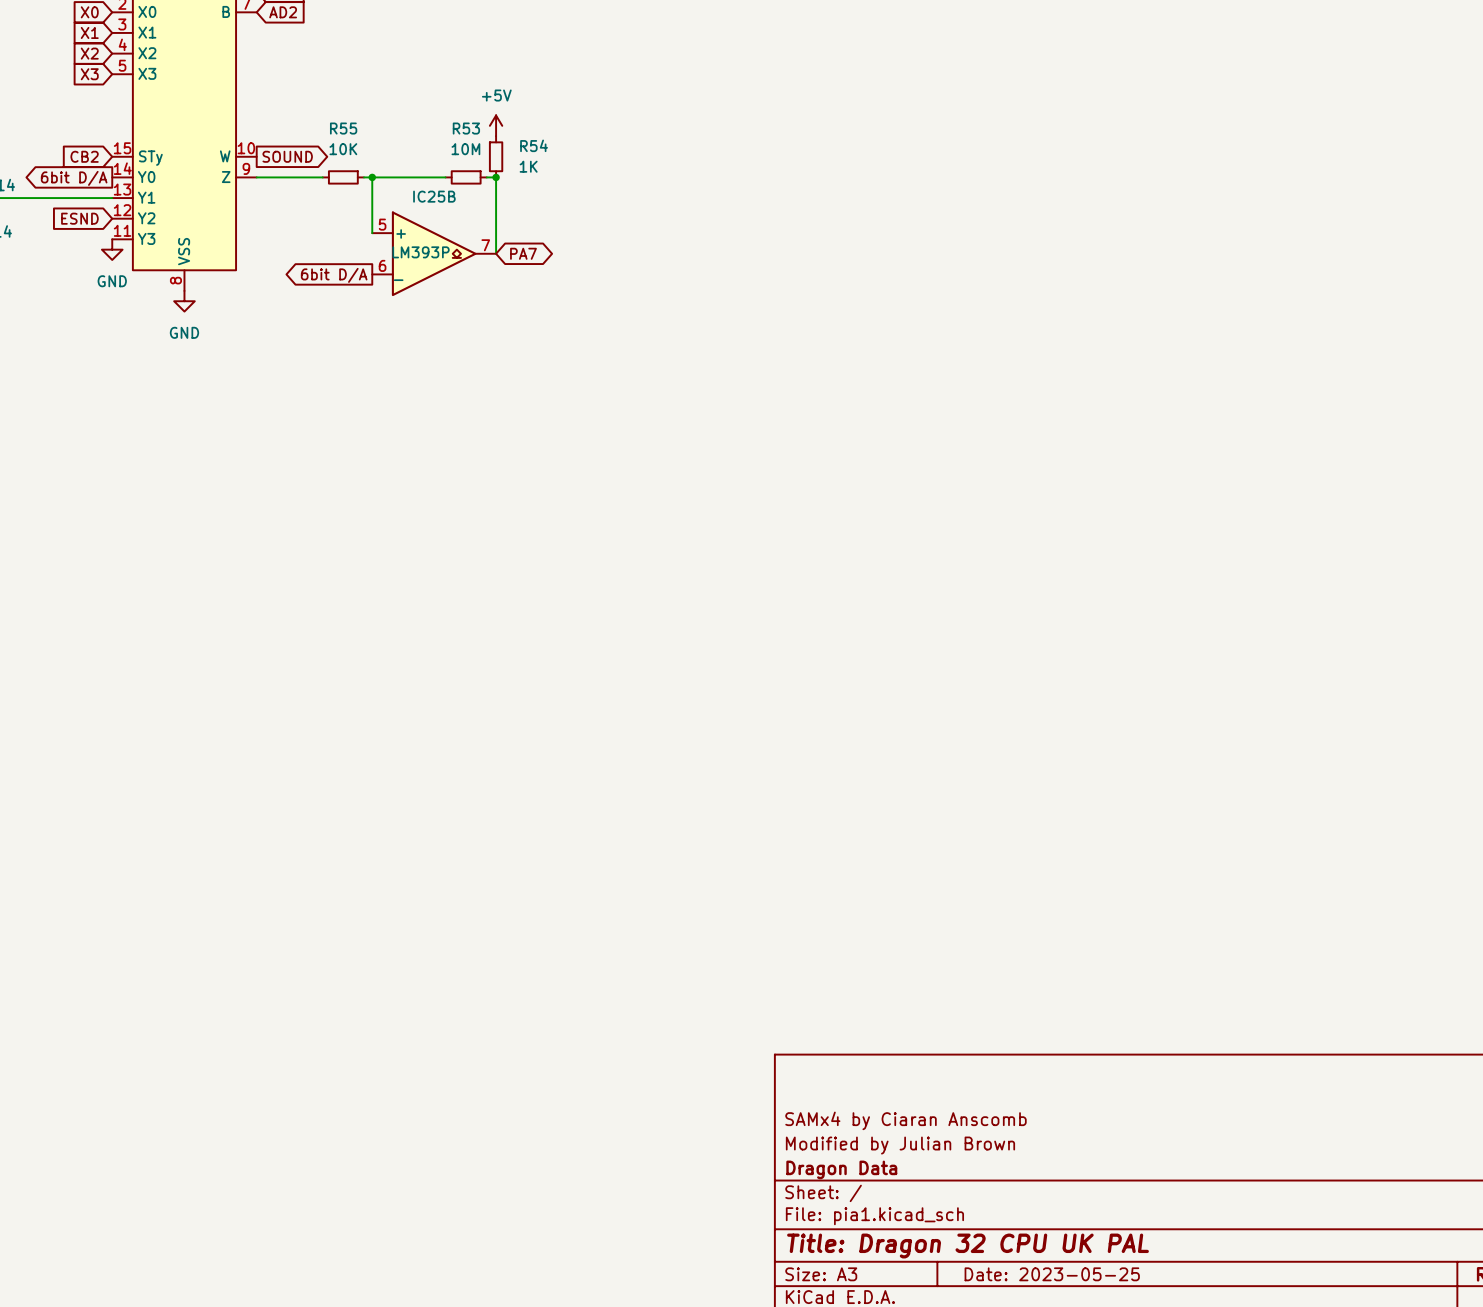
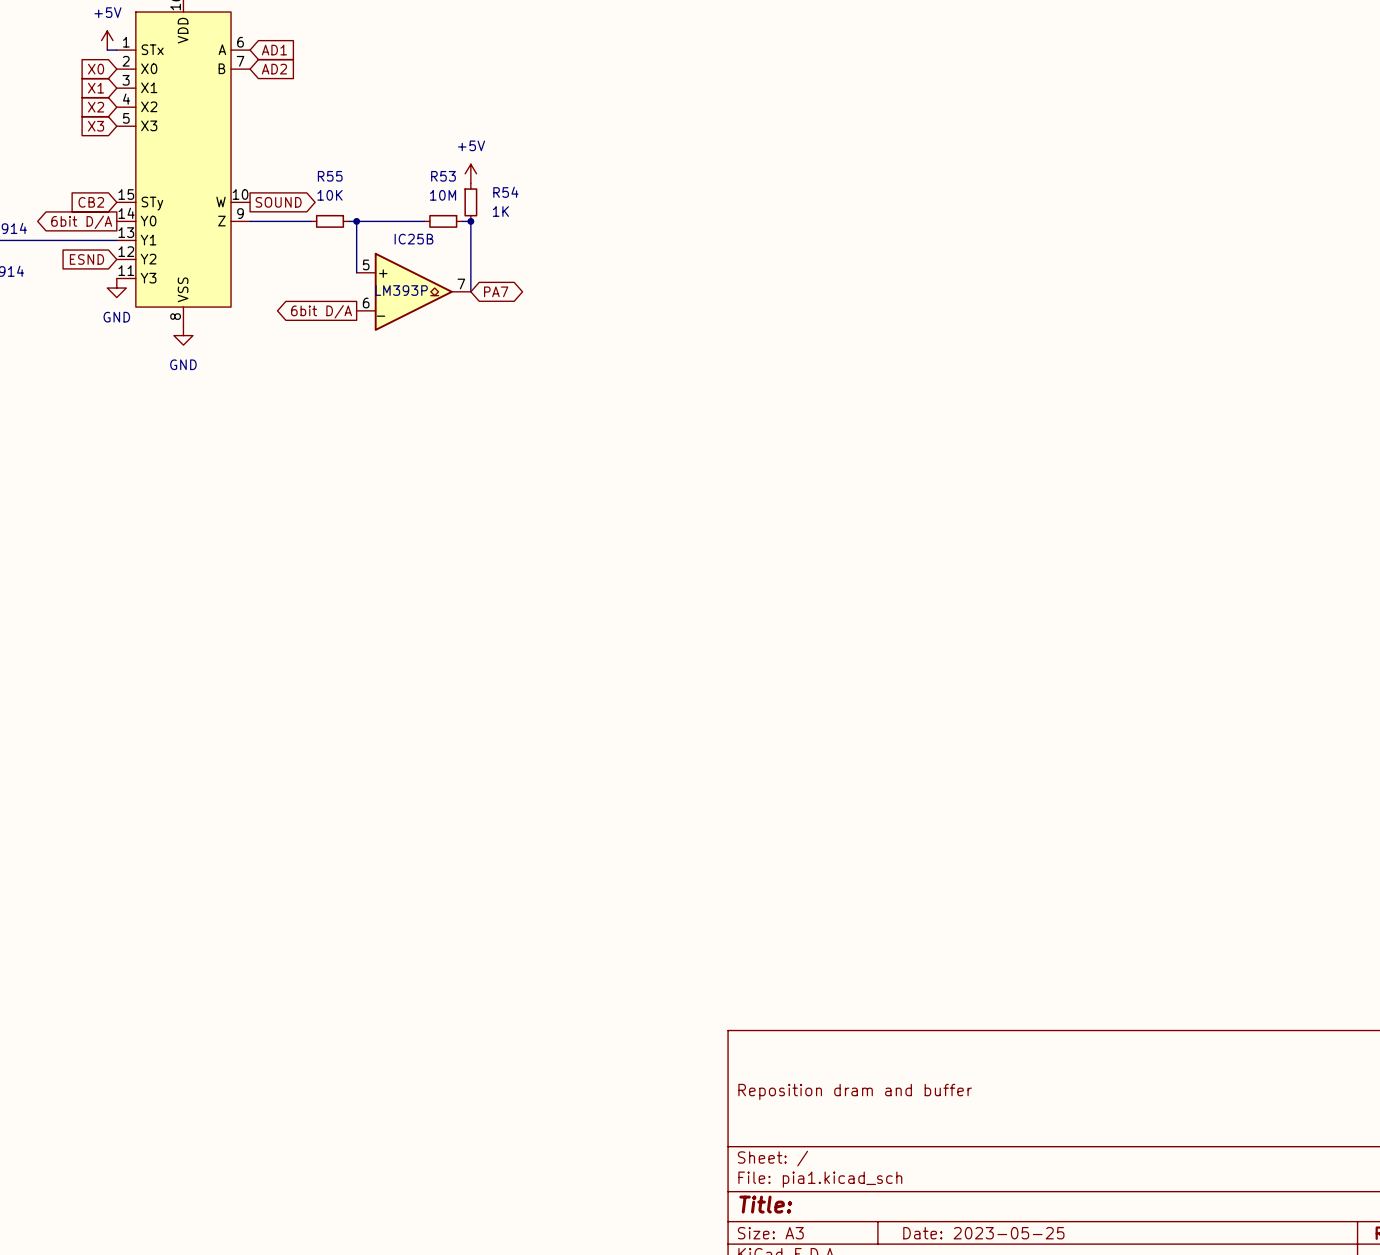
title block: SAMx4 by Ciaran Anscomb (905, 1120) -> Reposition dram and buffer (855, 1091)
title block: Modified by Julian Brown (900, 1145) -> none
title block: Dragon Data (841, 1169) -> none
title block: Title: Dragon 32 CPU UK PAL (968, 1246) -> Title: (765, 1204)

